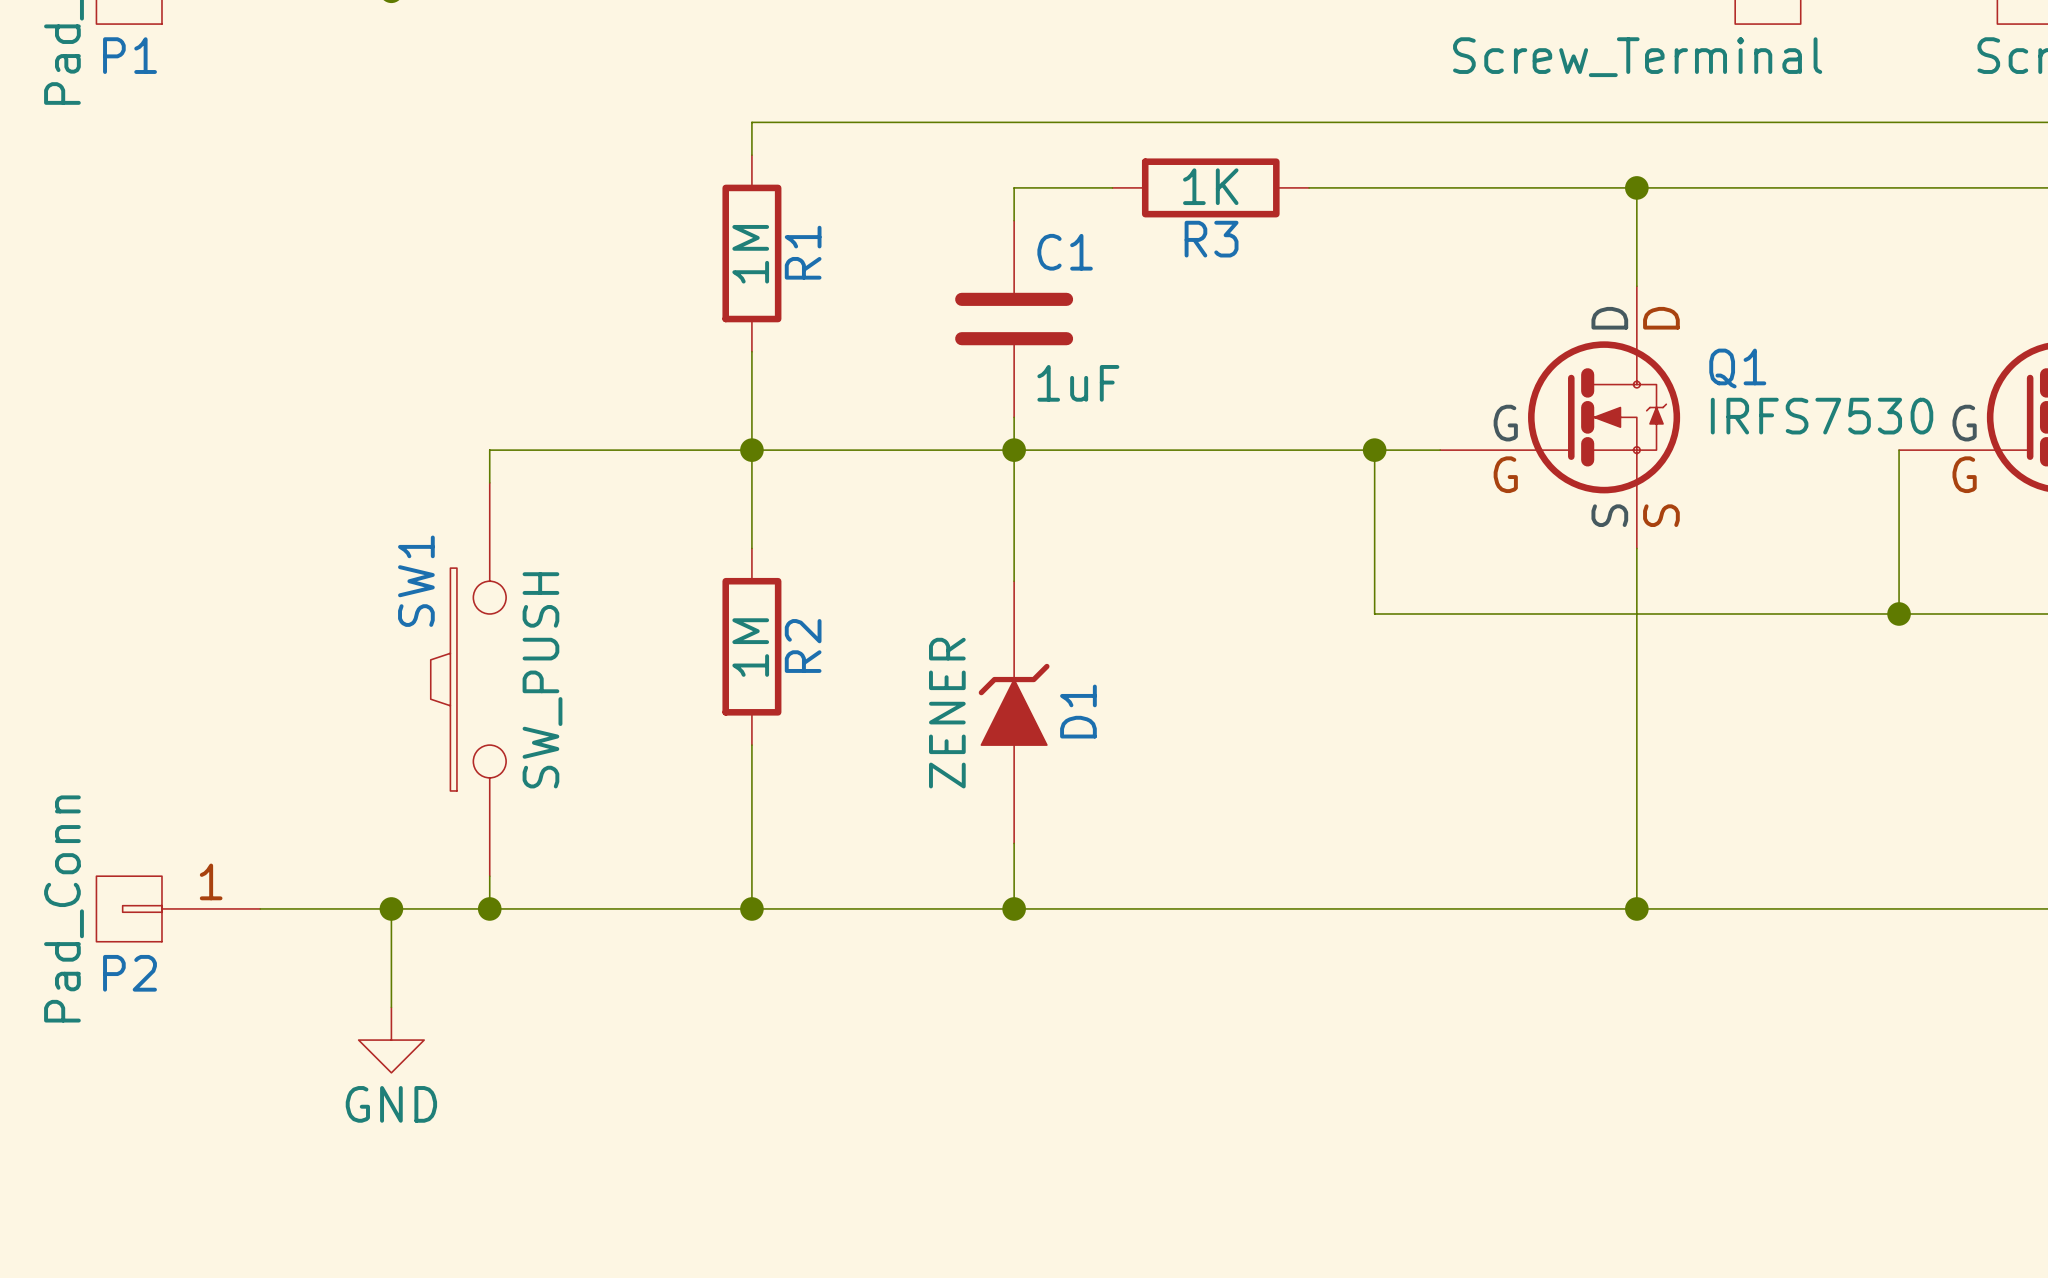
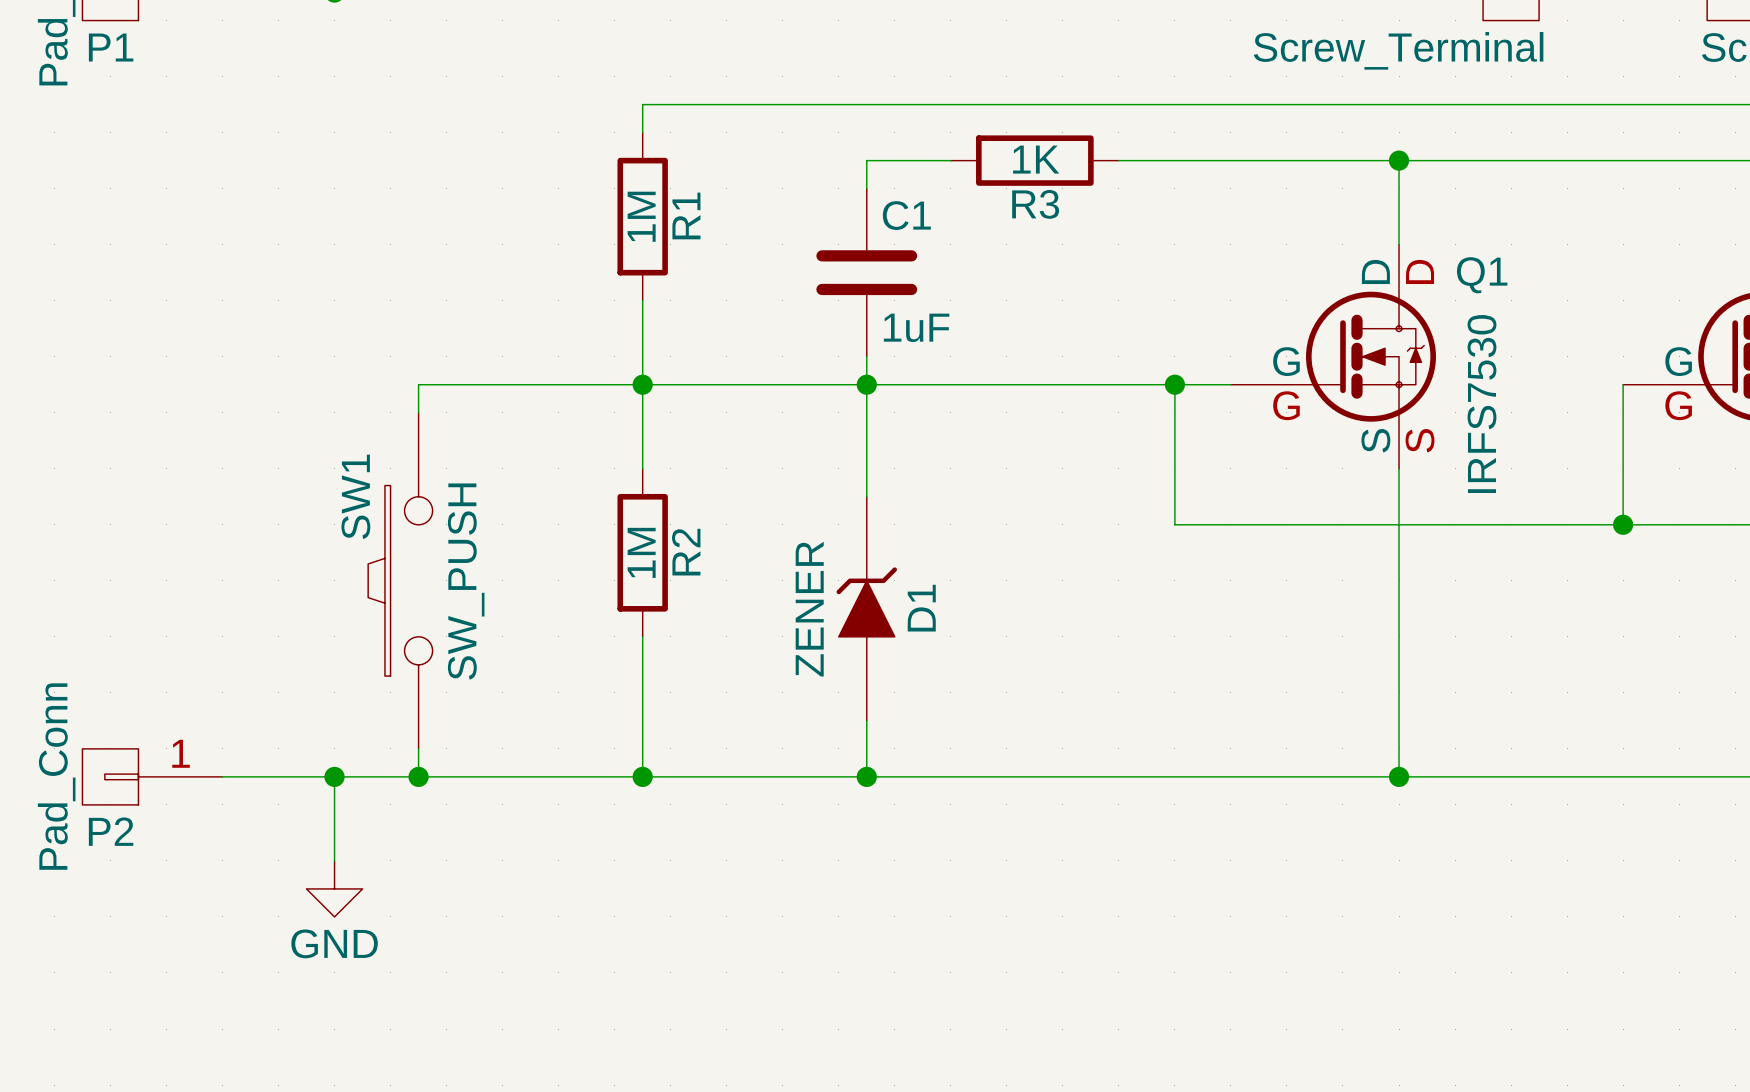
Q1 name position: Q1 (1737, 368) -> Q1 (1482, 275)
Q1 value rotation: 0° (1822, 416) -> 90° counterclockwise (1481, 404)

